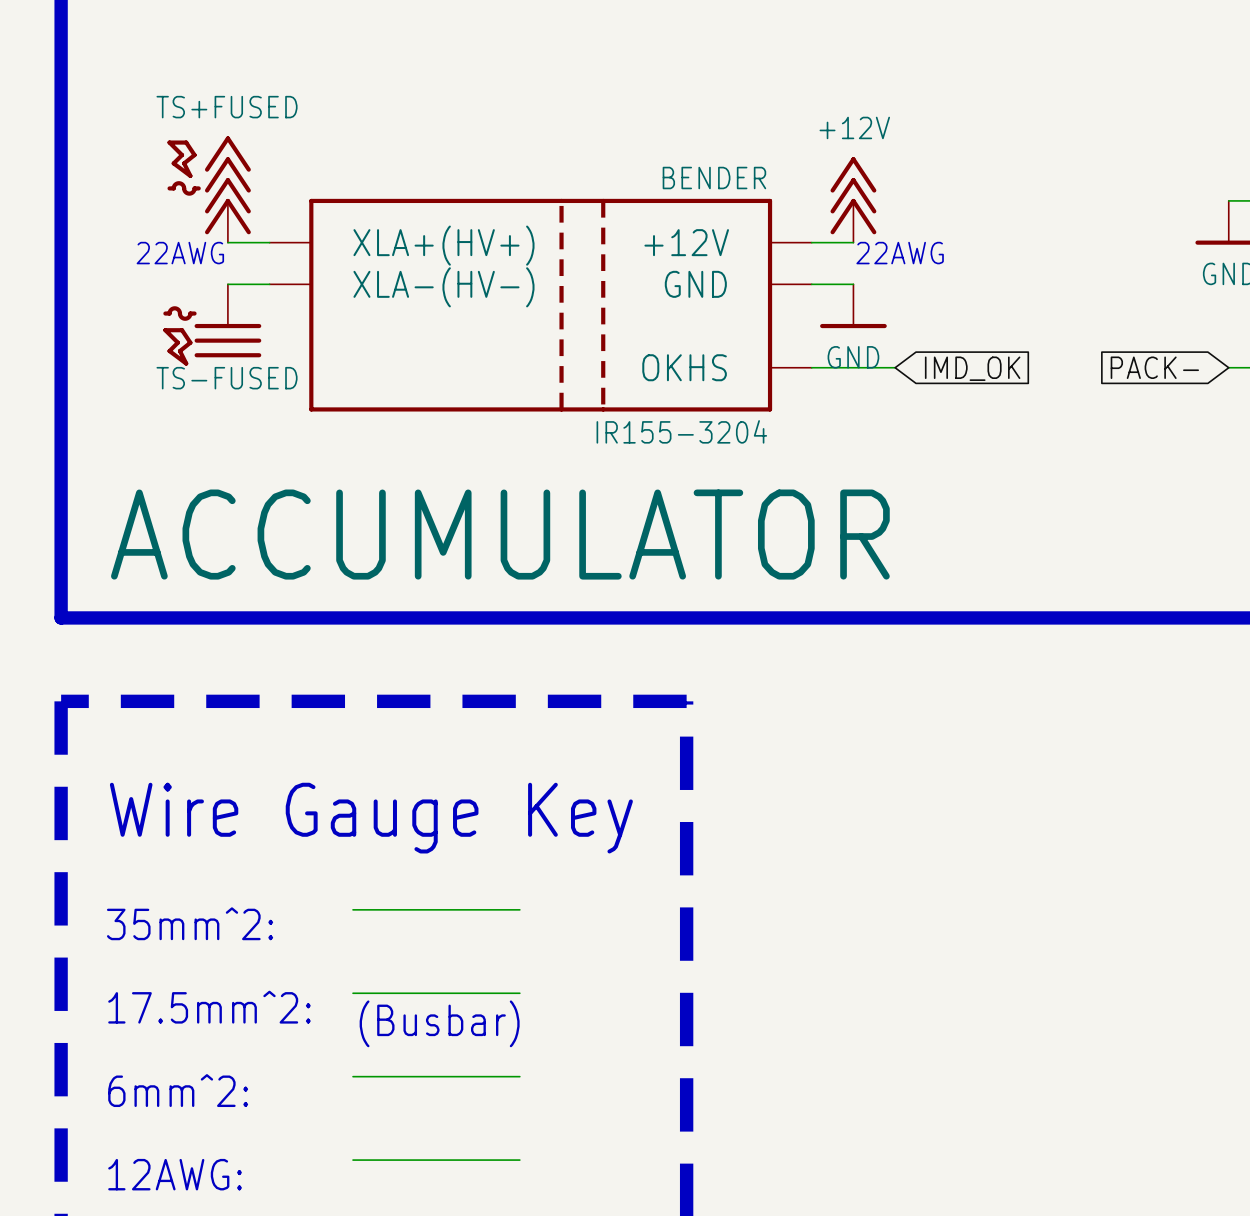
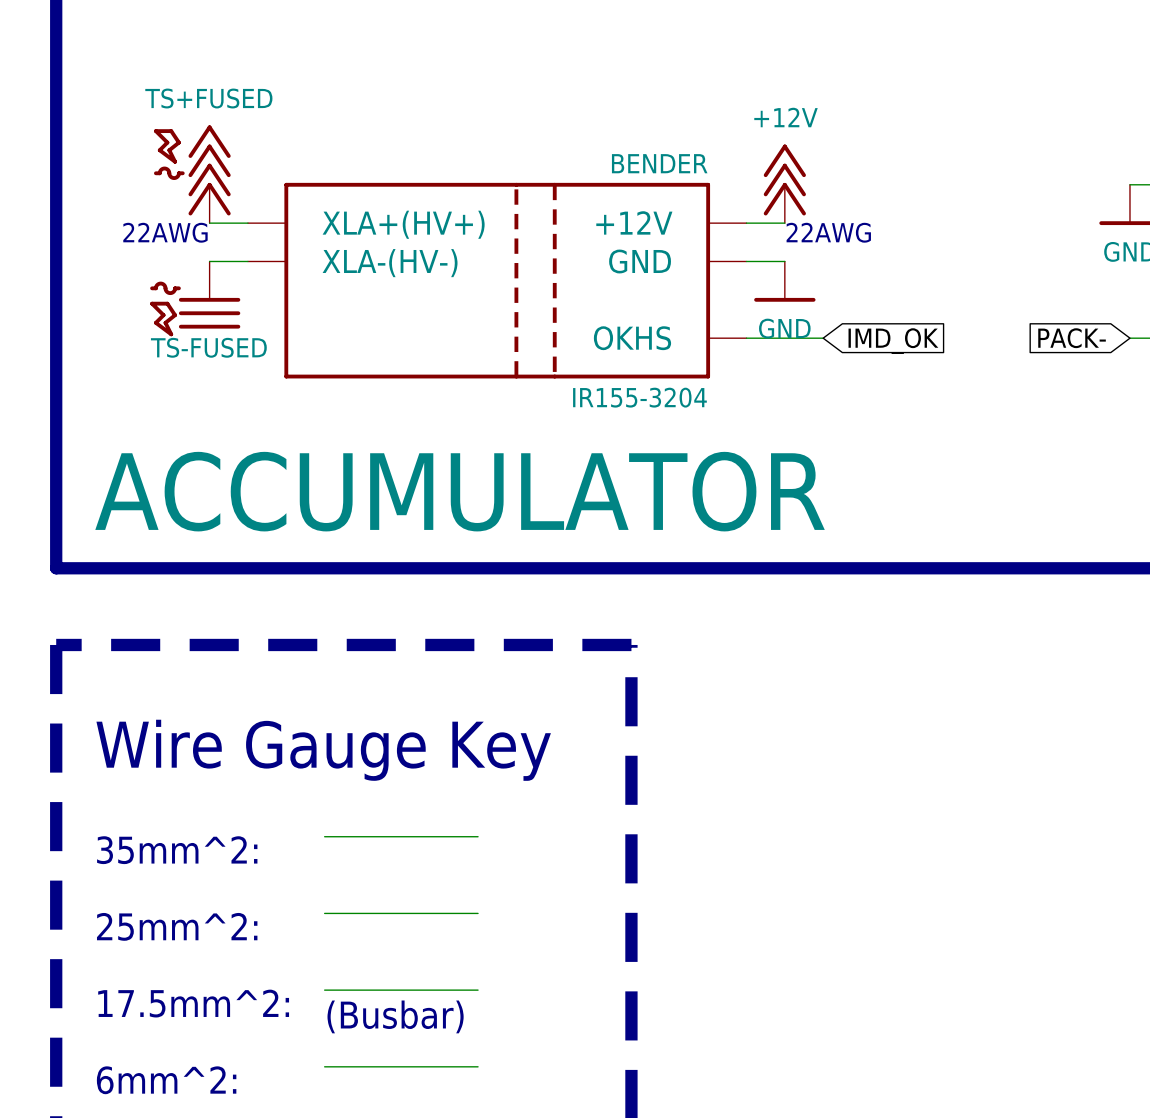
text: 17.5mm^2: (209, 1007) -> 25mm^2: (177, 926)
text position: (Busbar) (439, 1023) -> (Busbar) (395, 1016)
text: 6mm^2: (178, 1090) -> 17.5mm^2: (193, 1003)
text: 12AWG: (175, 1174) -> 6mm^2: (166, 1080)

